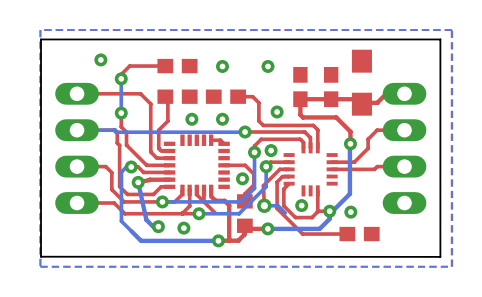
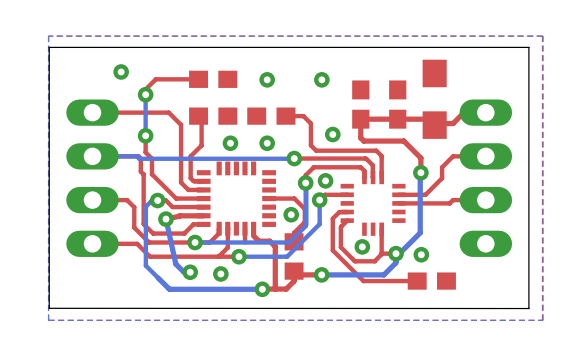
top track: (211, 140) (220, 140) (224, 143) -> none
top track: (289, 169) (279, 169) (263, 185) (264, 205) -> none
top track: (197, 189) (197, 194) (215, 213) -> none
bottom track: (264, 205) (278, 205) (285, 213) -> none
via: (264, 205) -> none

